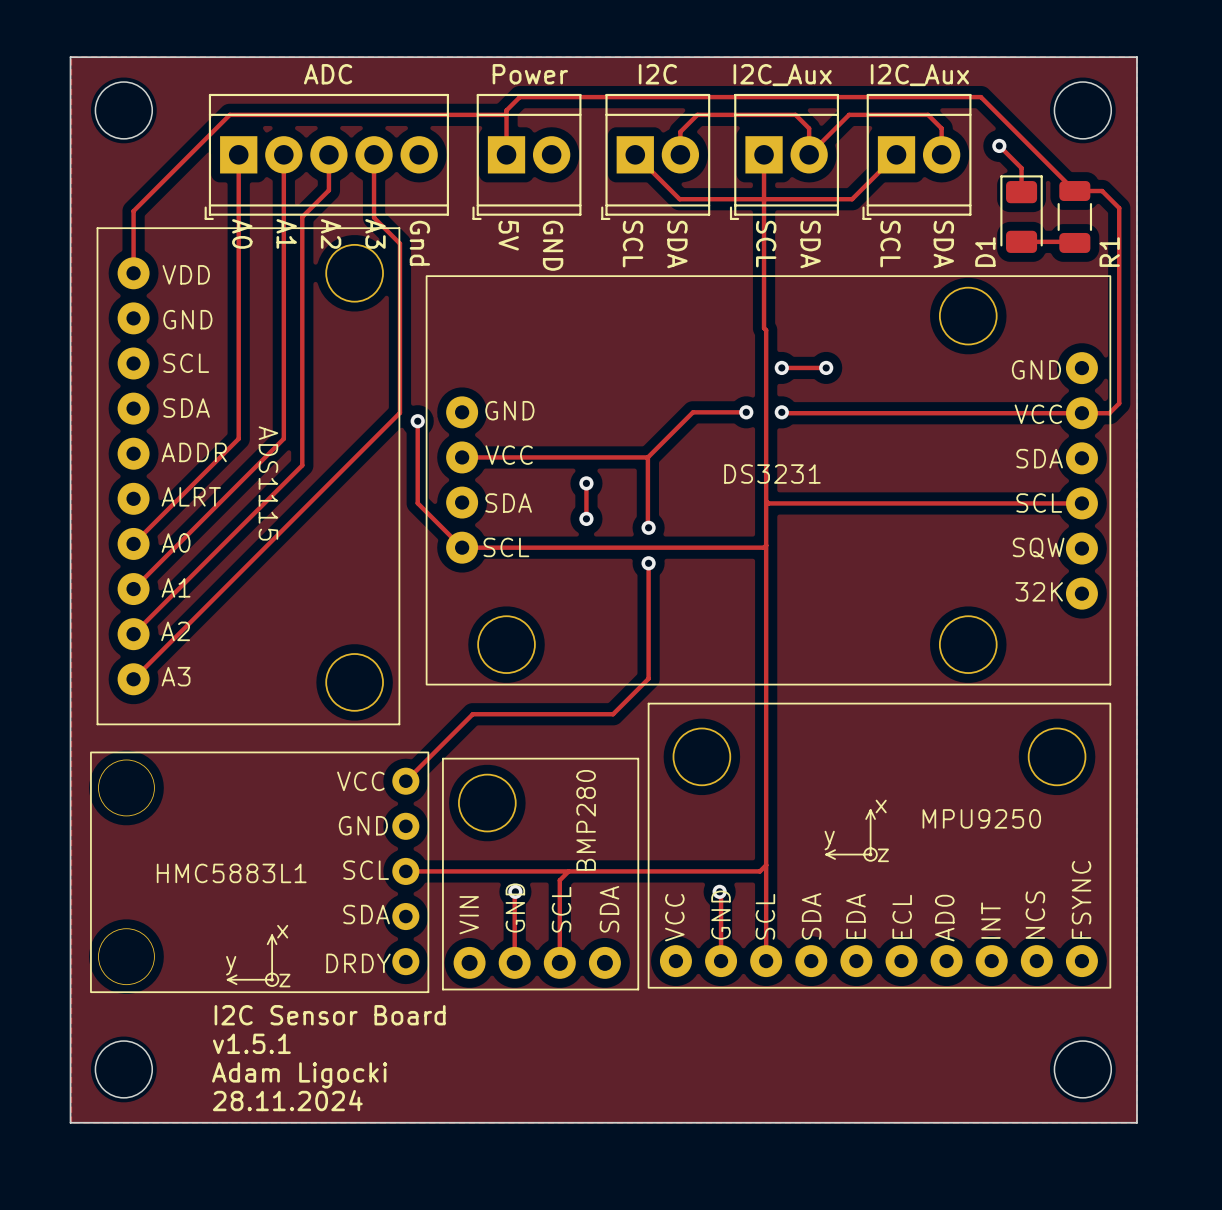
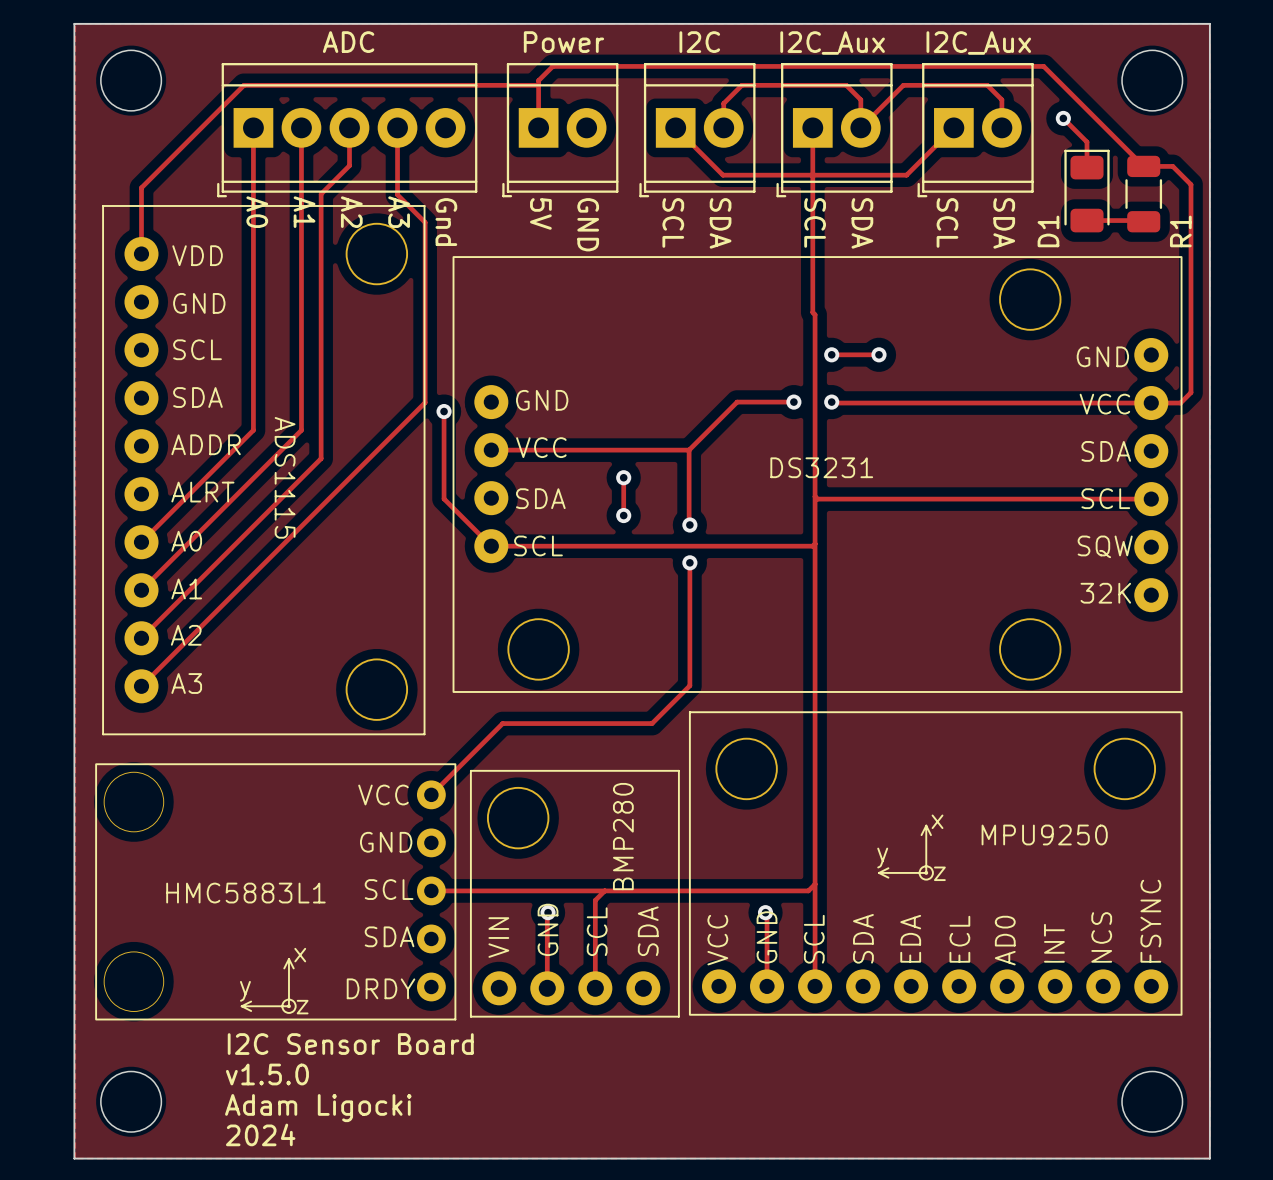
text: v1.5.1 (251, 1043) -> v1.5.0 (267, 1074)
text: 28.11.2024 (287, 1100) -> 2024 (260, 1134)

